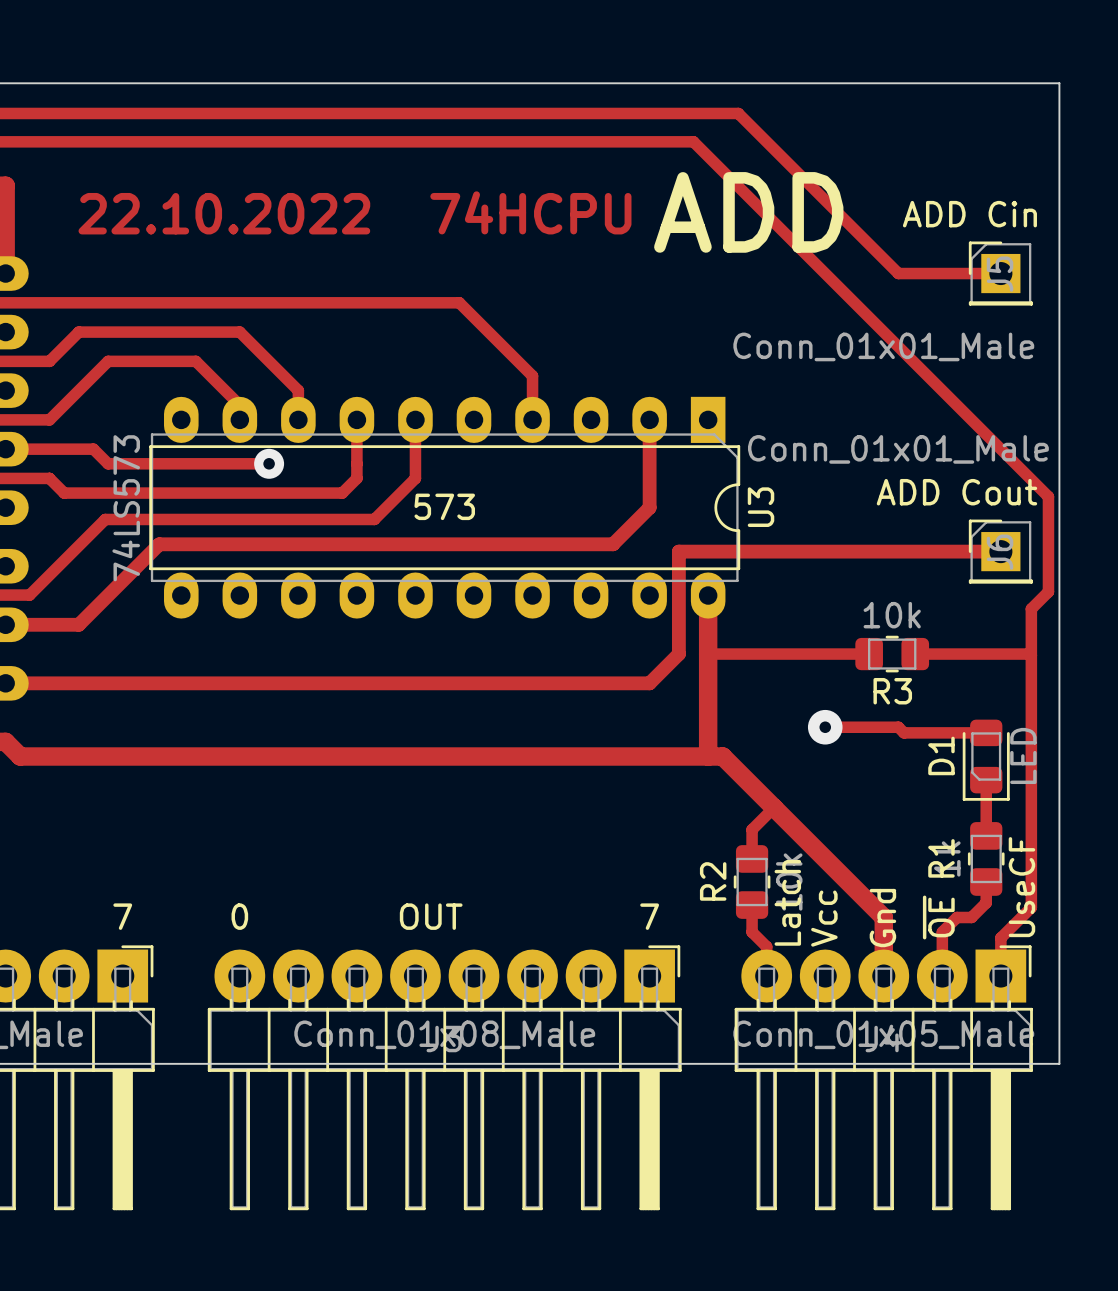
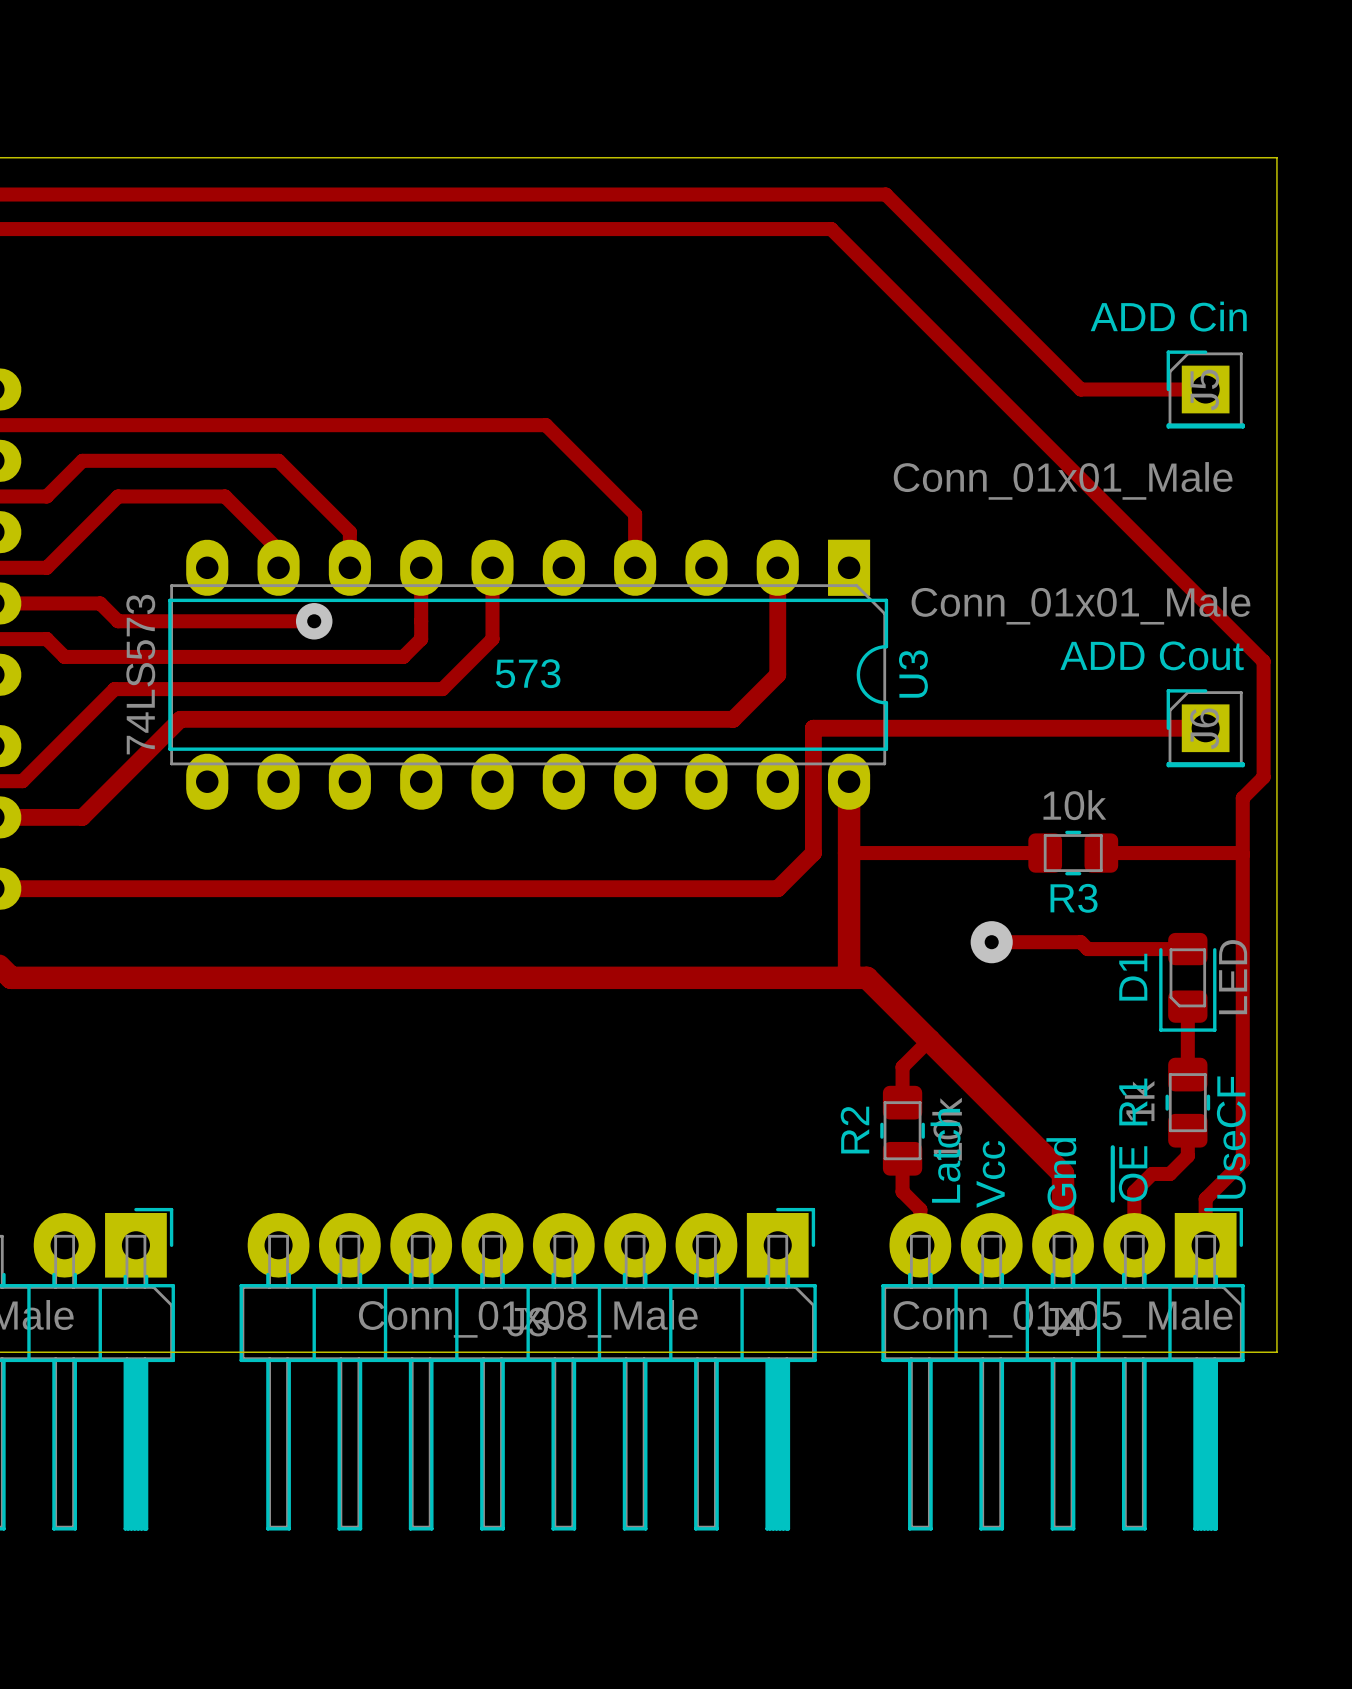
text: 74HCPU (530, 212) -> none
text: ADD (748, 212) -> none
text: 22.10.2022 (224, 213) -> none
text: 7 (122, 916) -> none
text: 0 (239, 916) -> none
text: OUT (431, 916) -> none
text: 7 (649, 916) -> none

